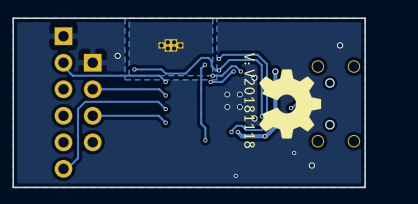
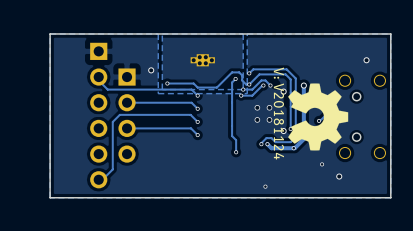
drawing shape: [244, 52, 255, 149] -> [273, 67, 285, 160]

